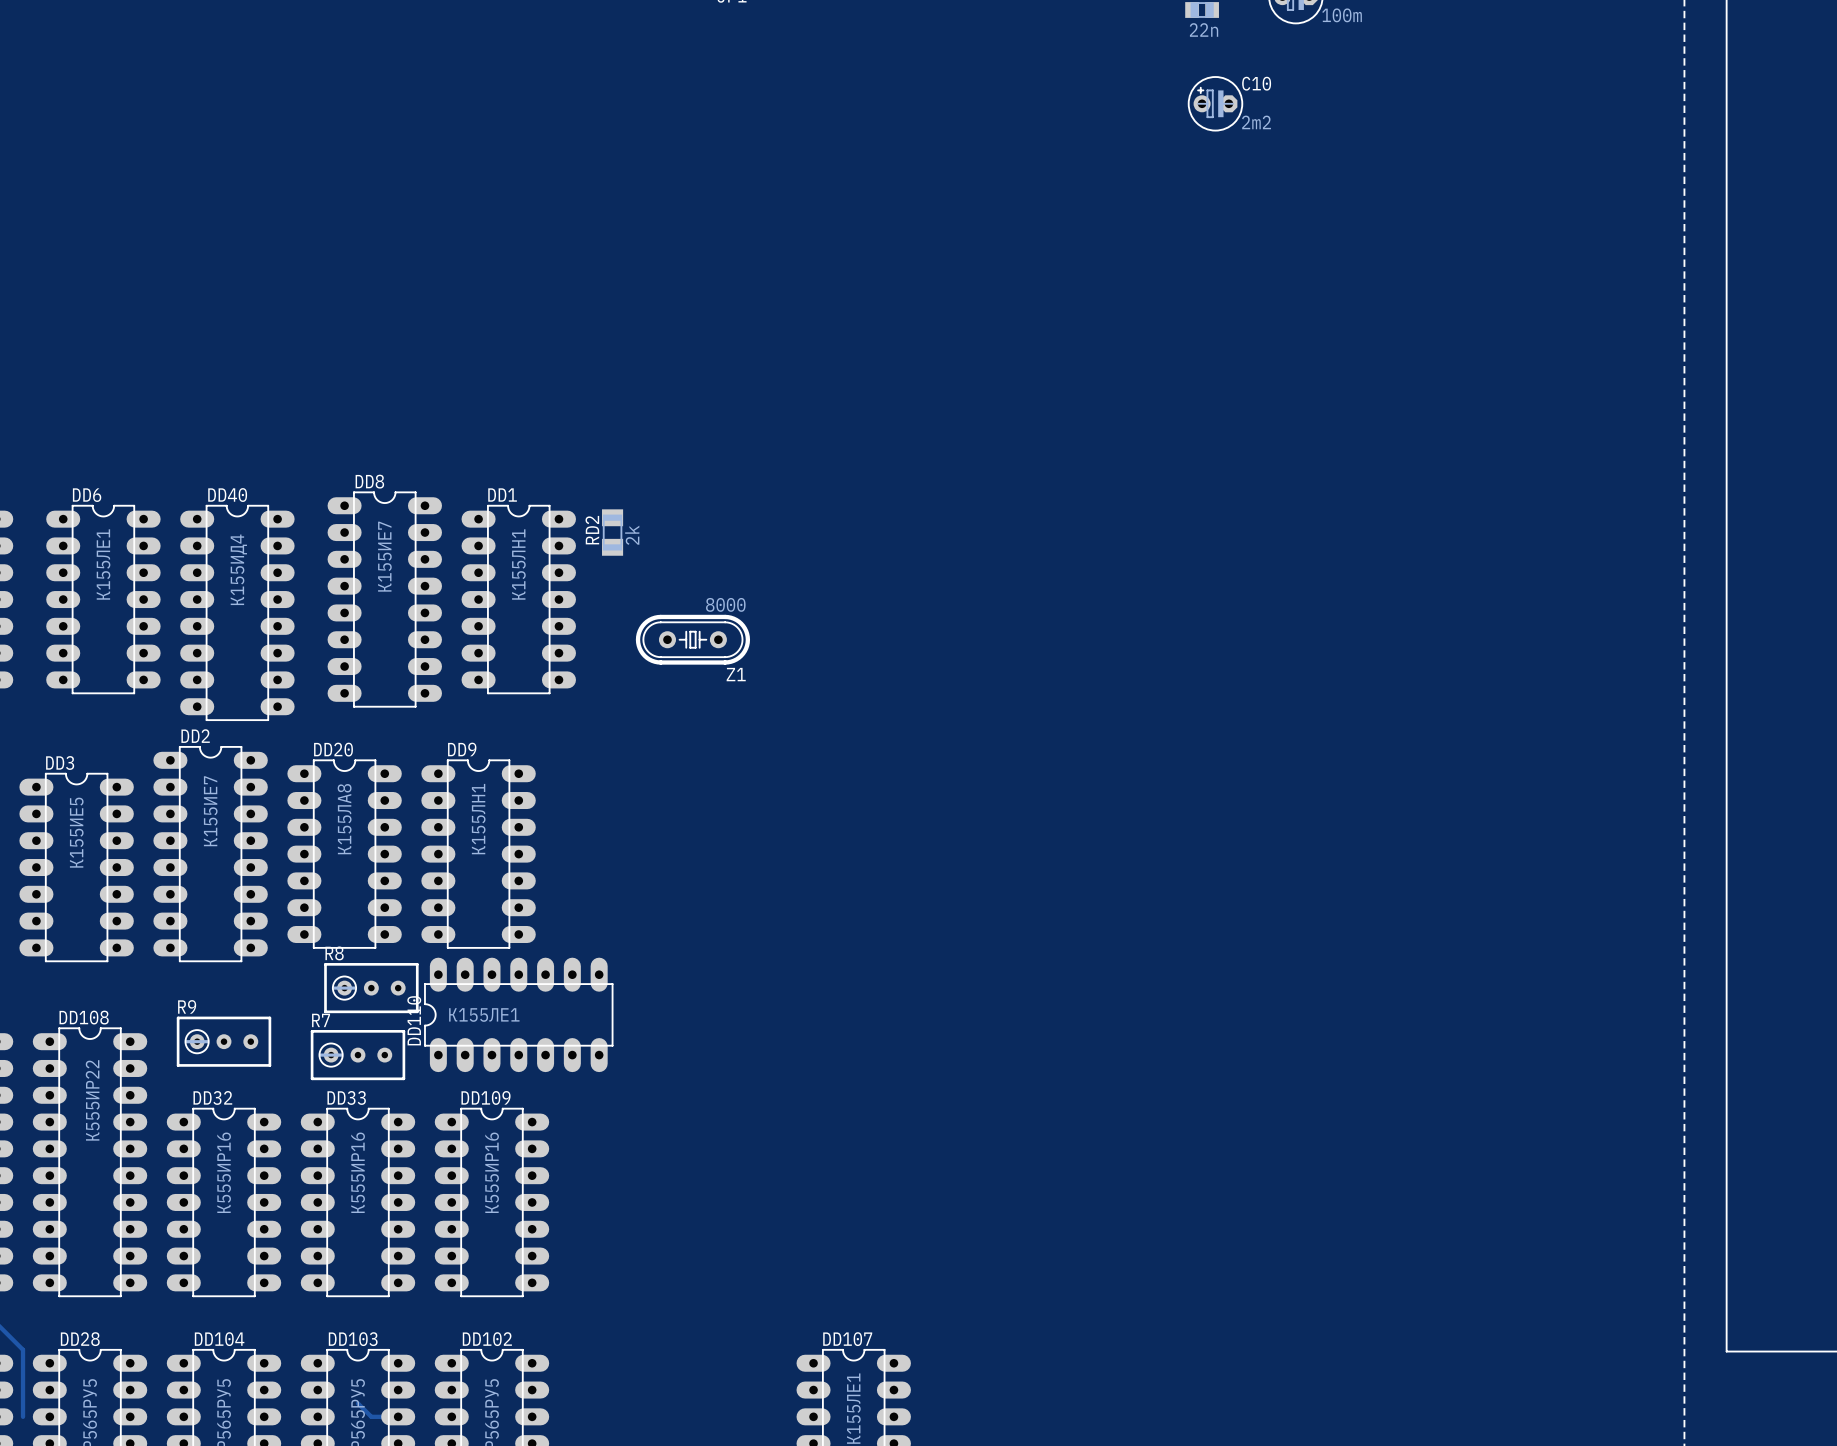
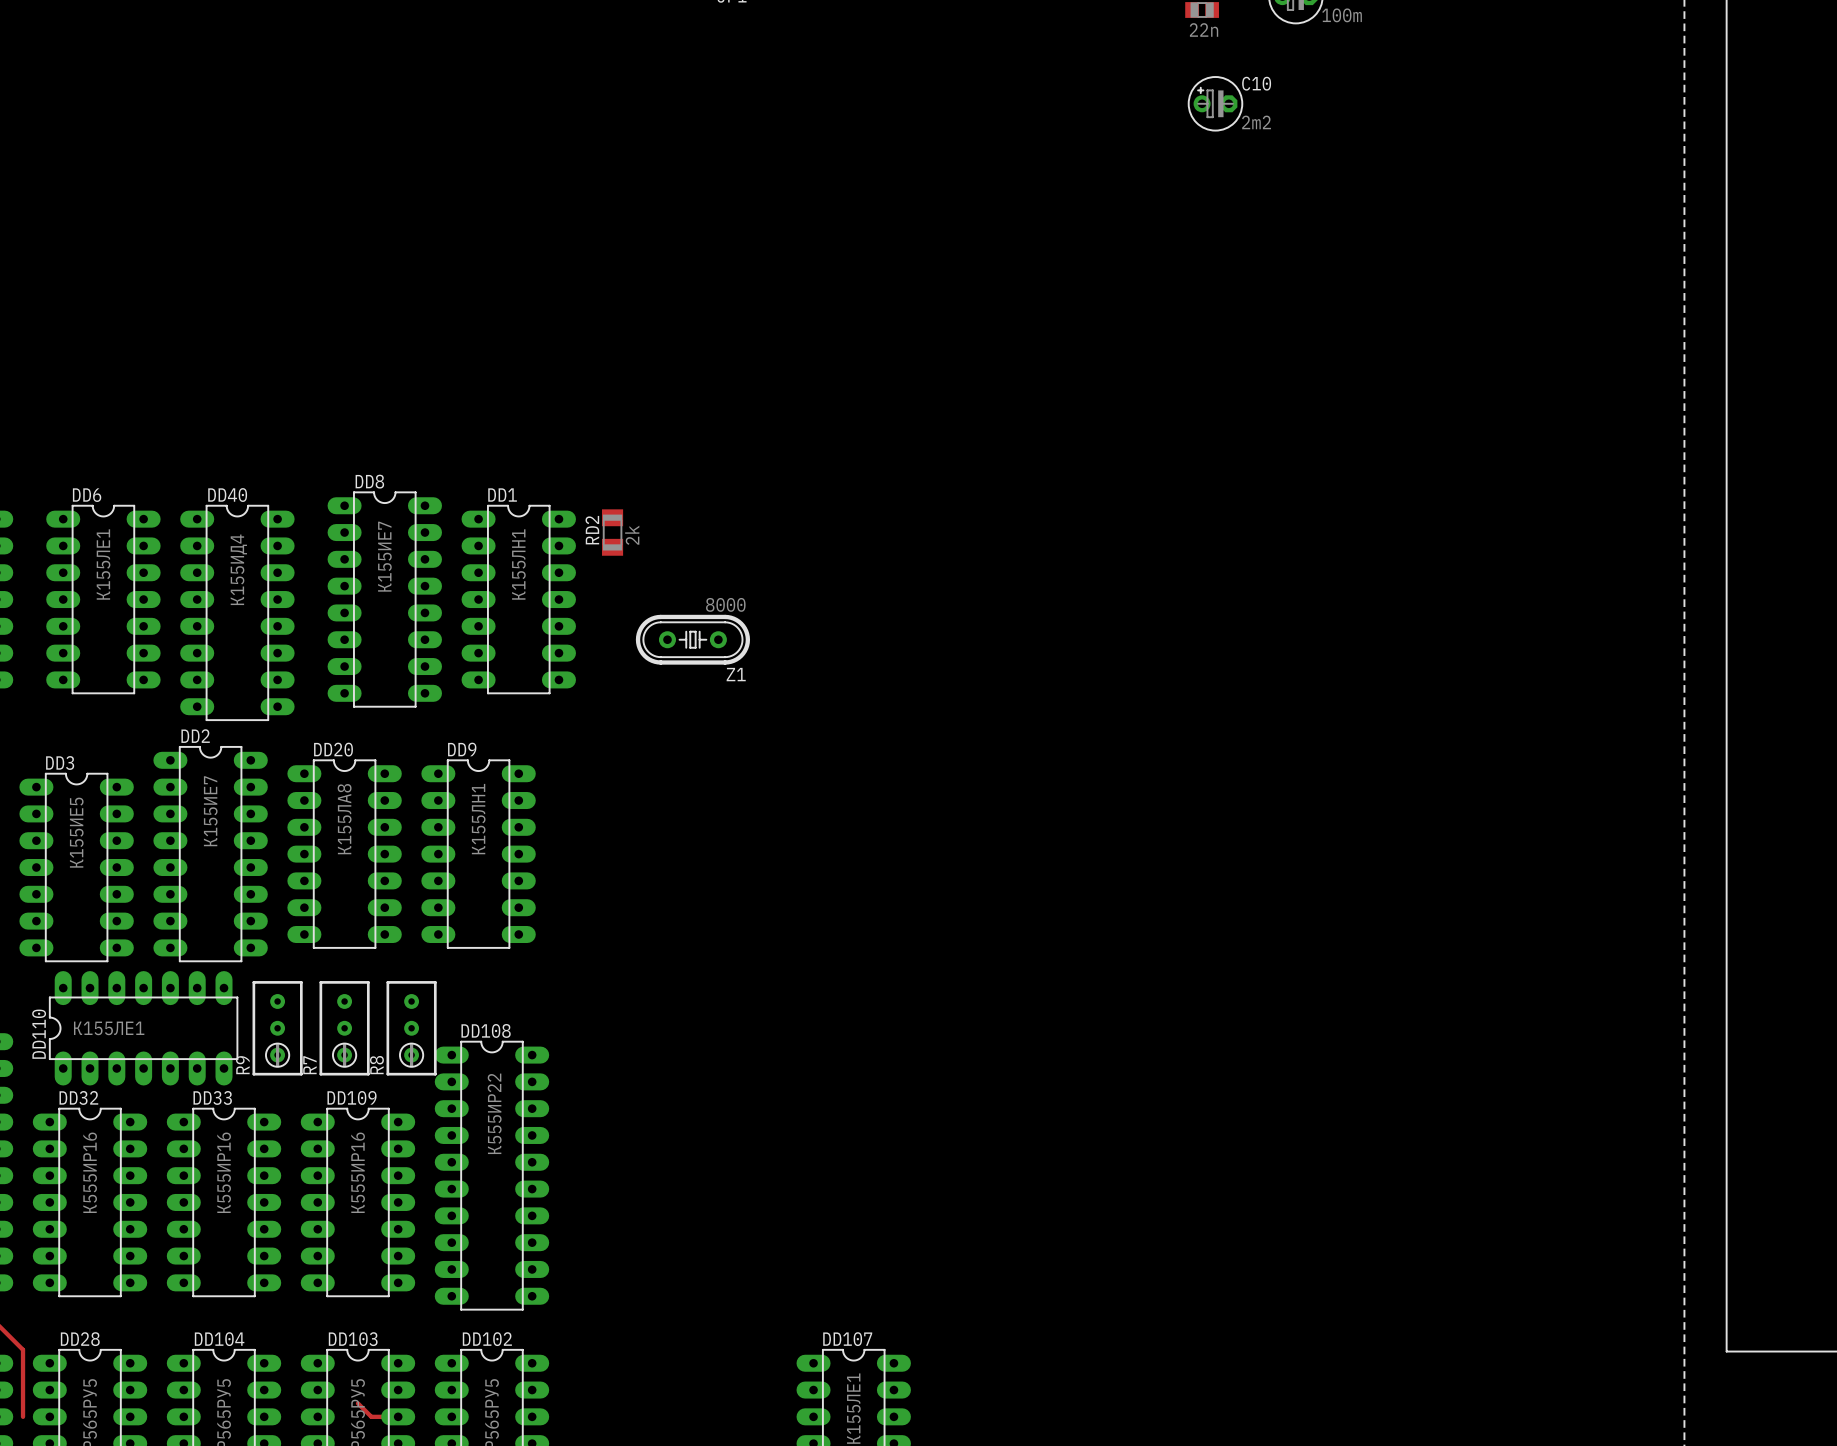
R8 rotation: 0° (371, 988) -> 90° counterclockwise (411, 1028)
R8 position: (371, 988) -> (411, 1028)
DD110 position: (518, 1014) -> (143, 1028)
R9 rotation: 0° (224, 1041) -> 90° counterclockwise (277, 1028)
R7 rotation: 0° (357, 1055) -> 90° counterclockwise (344, 1028)
DD32 name: DD32 (212, 1097) -> DD33 (212, 1097)
DD33 name: DD33 (346, 1097) -> DD109 (352, 1097)
DD108 position: (90, 1162) -> (491, 1175)
DD32: none -> К555ИР16 (90, 1202)
DD109: К555ИР16 (491, 1202) -> none

